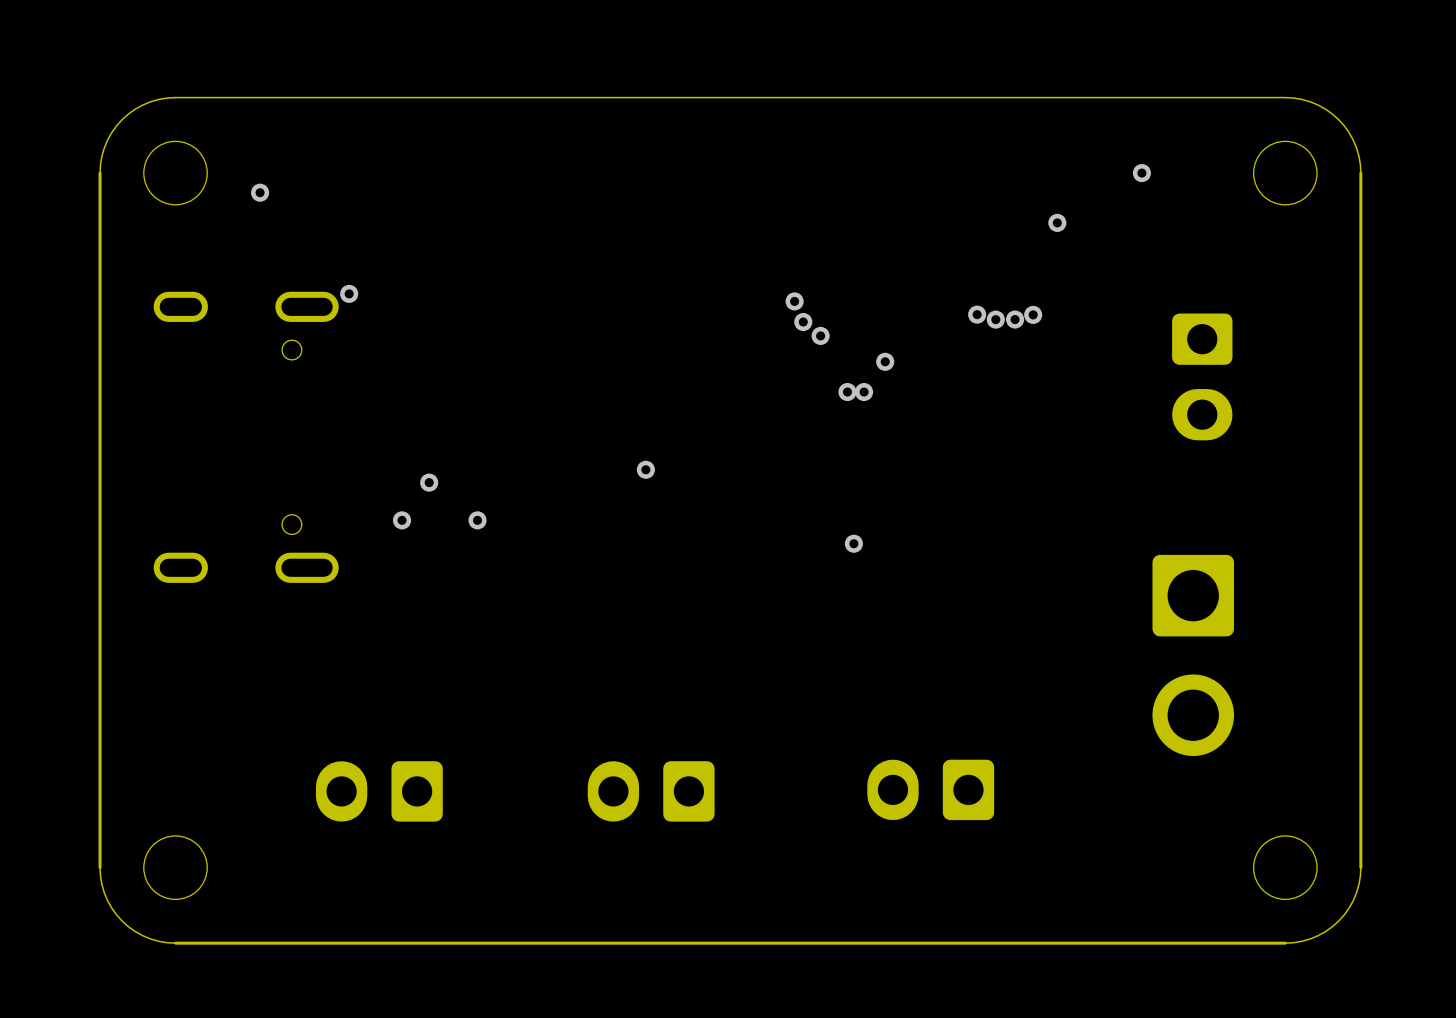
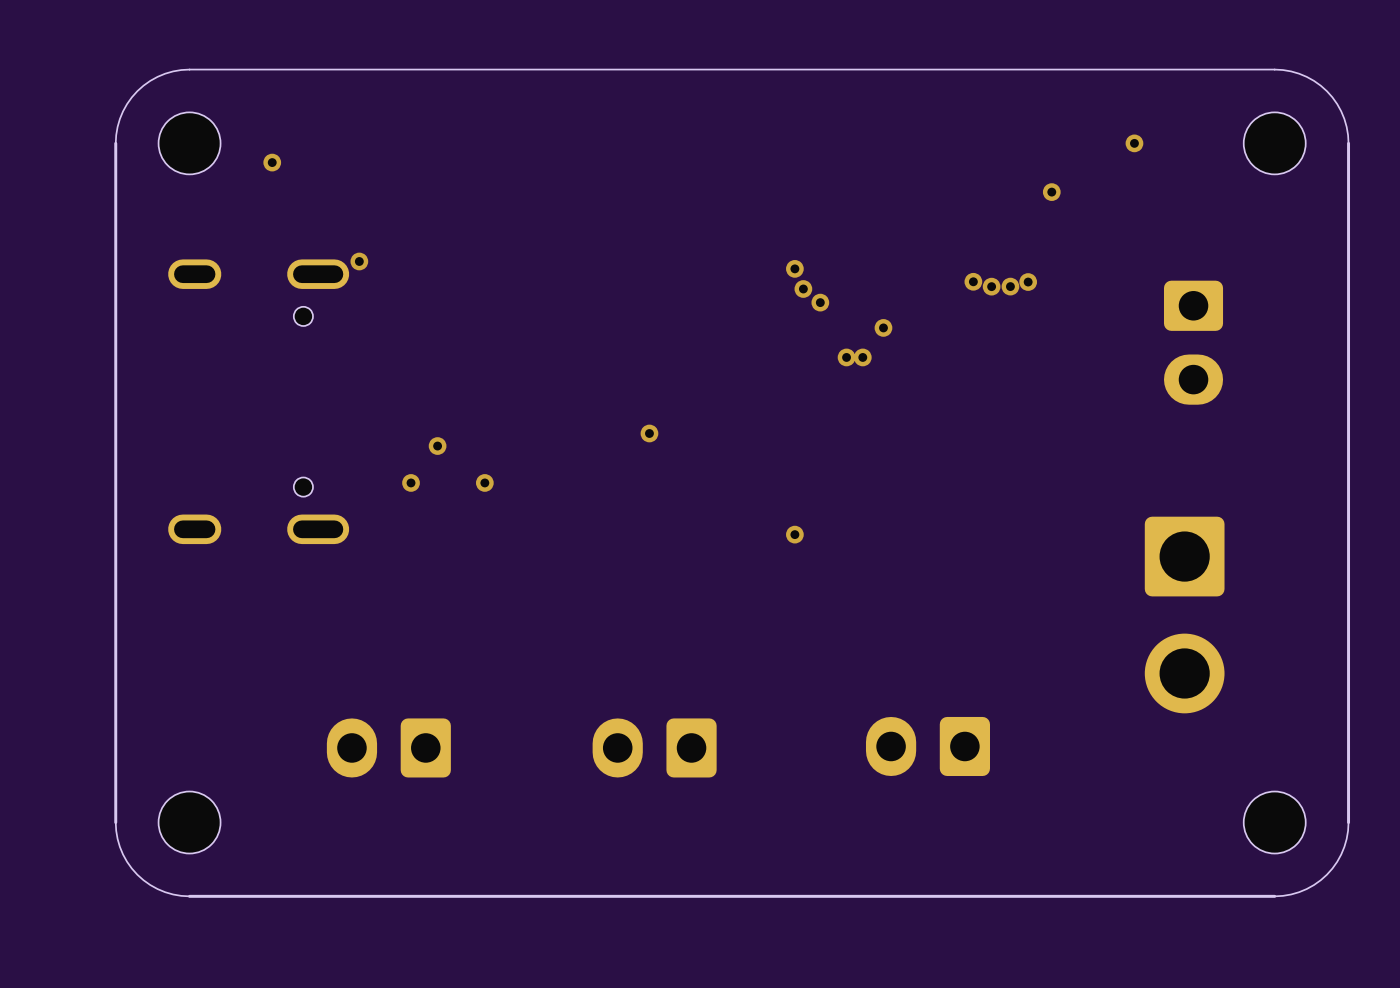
via position: (853, 543) -> (794, 534)

